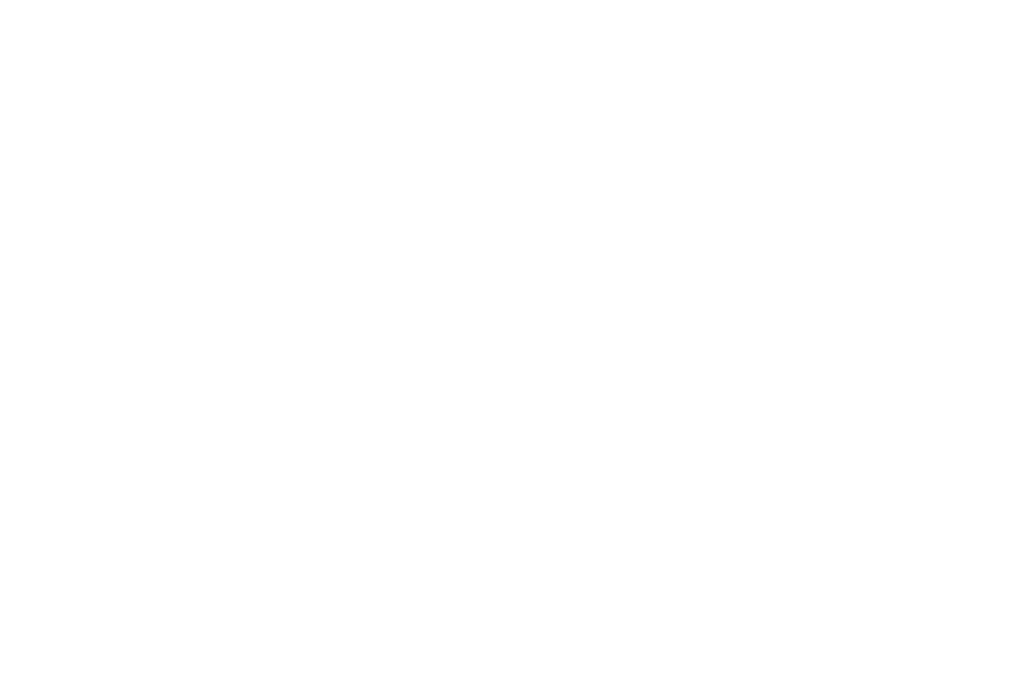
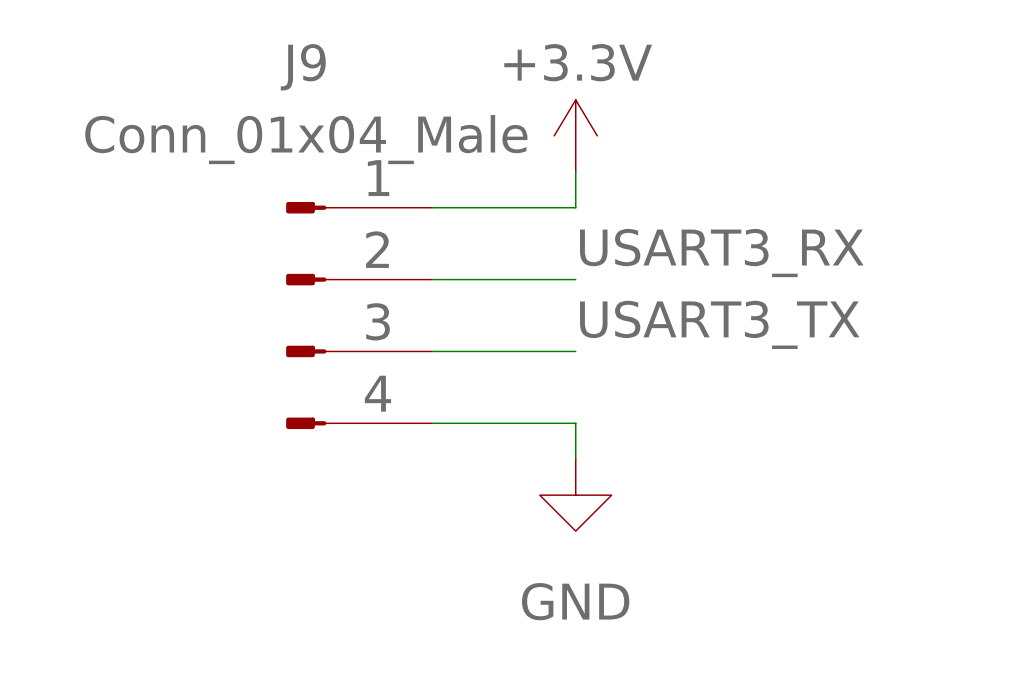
power symbol: none -> +3.3V (575, 135)
wire: none -> (575, 171) (575, 207) (432, 207)
label: none -> USART3_RX (721, 253)
wire: none -> (432, 279) (575, 279)
J9: none -> Conn_01x04_Male (359, 315)
label: none -> USART3_TX (719, 324)
wire: none -> (432, 351) (575, 351)
wire: none -> (432, 423) (575, 423) (575, 459)
power symbol: none -> GND (575, 495)

